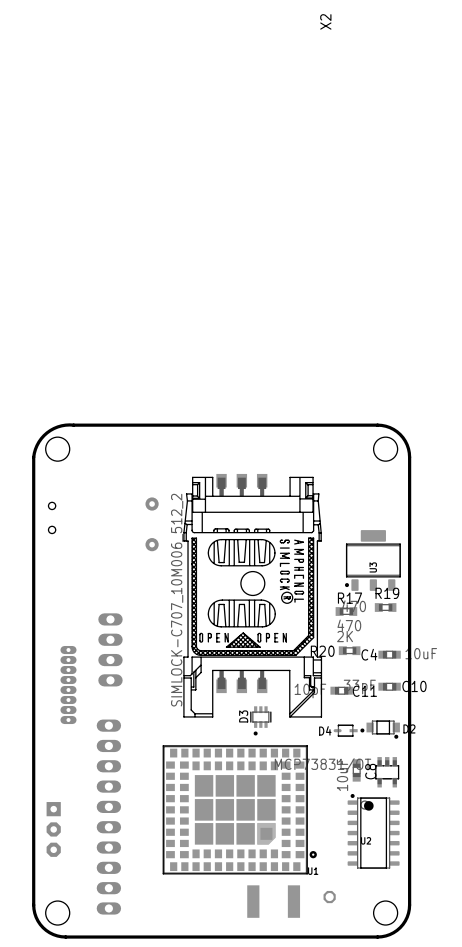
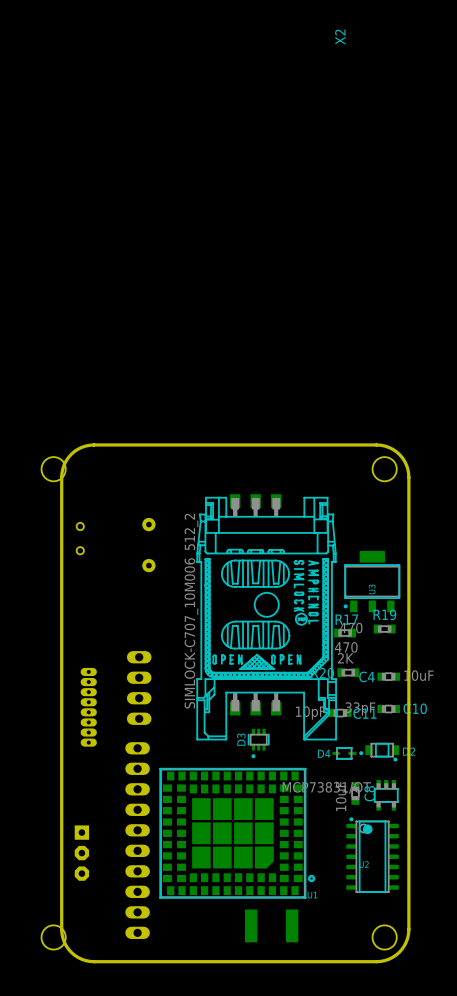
board edge: (97, 425) (65, 425) (53, 428) (39, 441) (33, 457) (33, 909) (40, 924) (53, 934) (65, 937) (97, 937) -> (94, 444) (81, 447) (71, 454) (64, 464) (61, 477) (61, 933) (66, 945) (71, 952) (81, 959) (94, 961)
part position: (52, 517) -> (80, 538)
X2 position: (252, 595) -> (266, 617)
part position: (110, 649) -> (139, 687)
part position: (68, 685) -> (88, 707)
part position: (108, 817) -> (137, 840)
part position: (53, 829) -> (81, 853)
part: (329, 897) -> none

